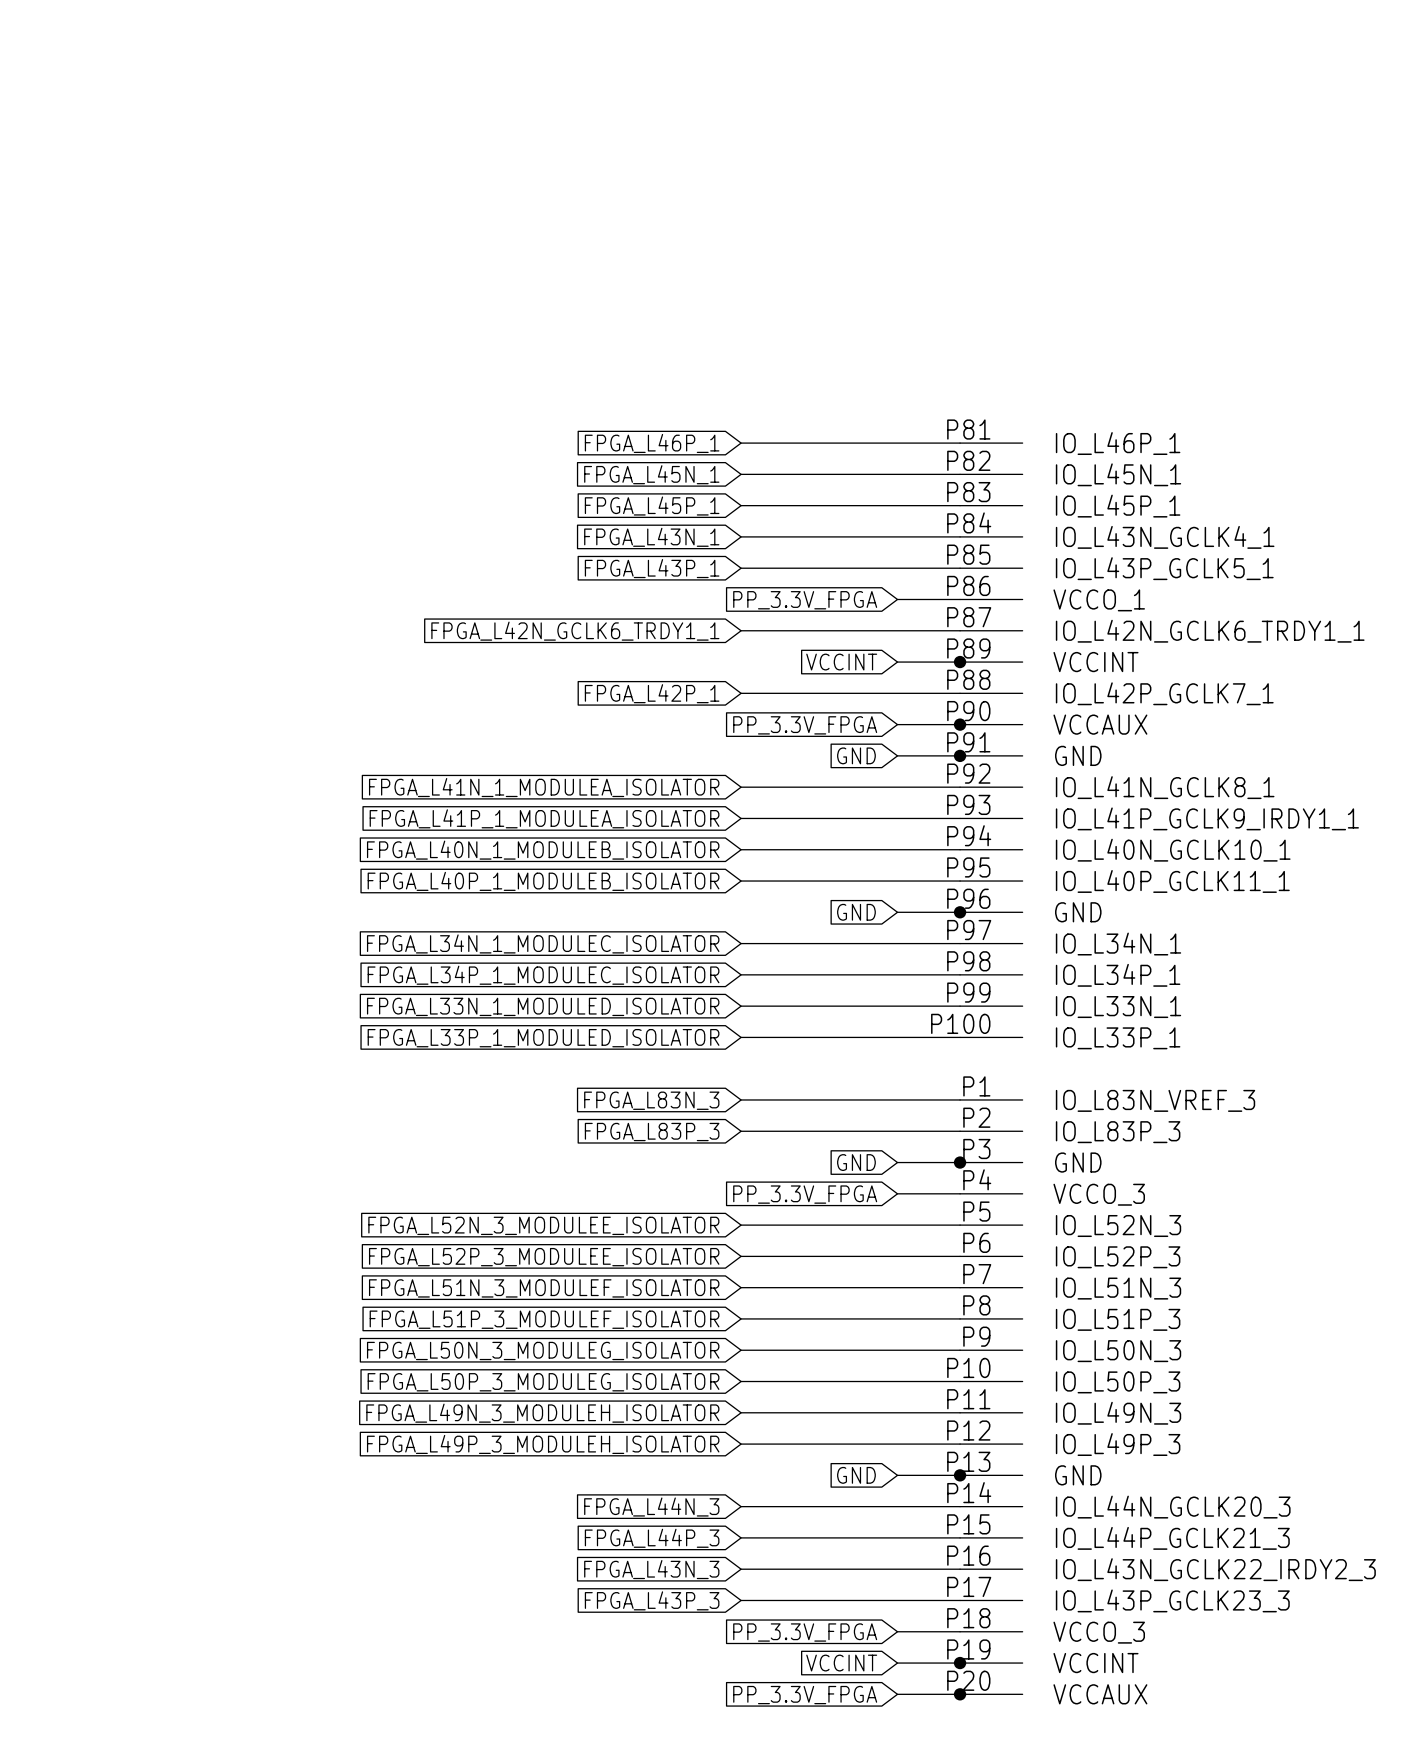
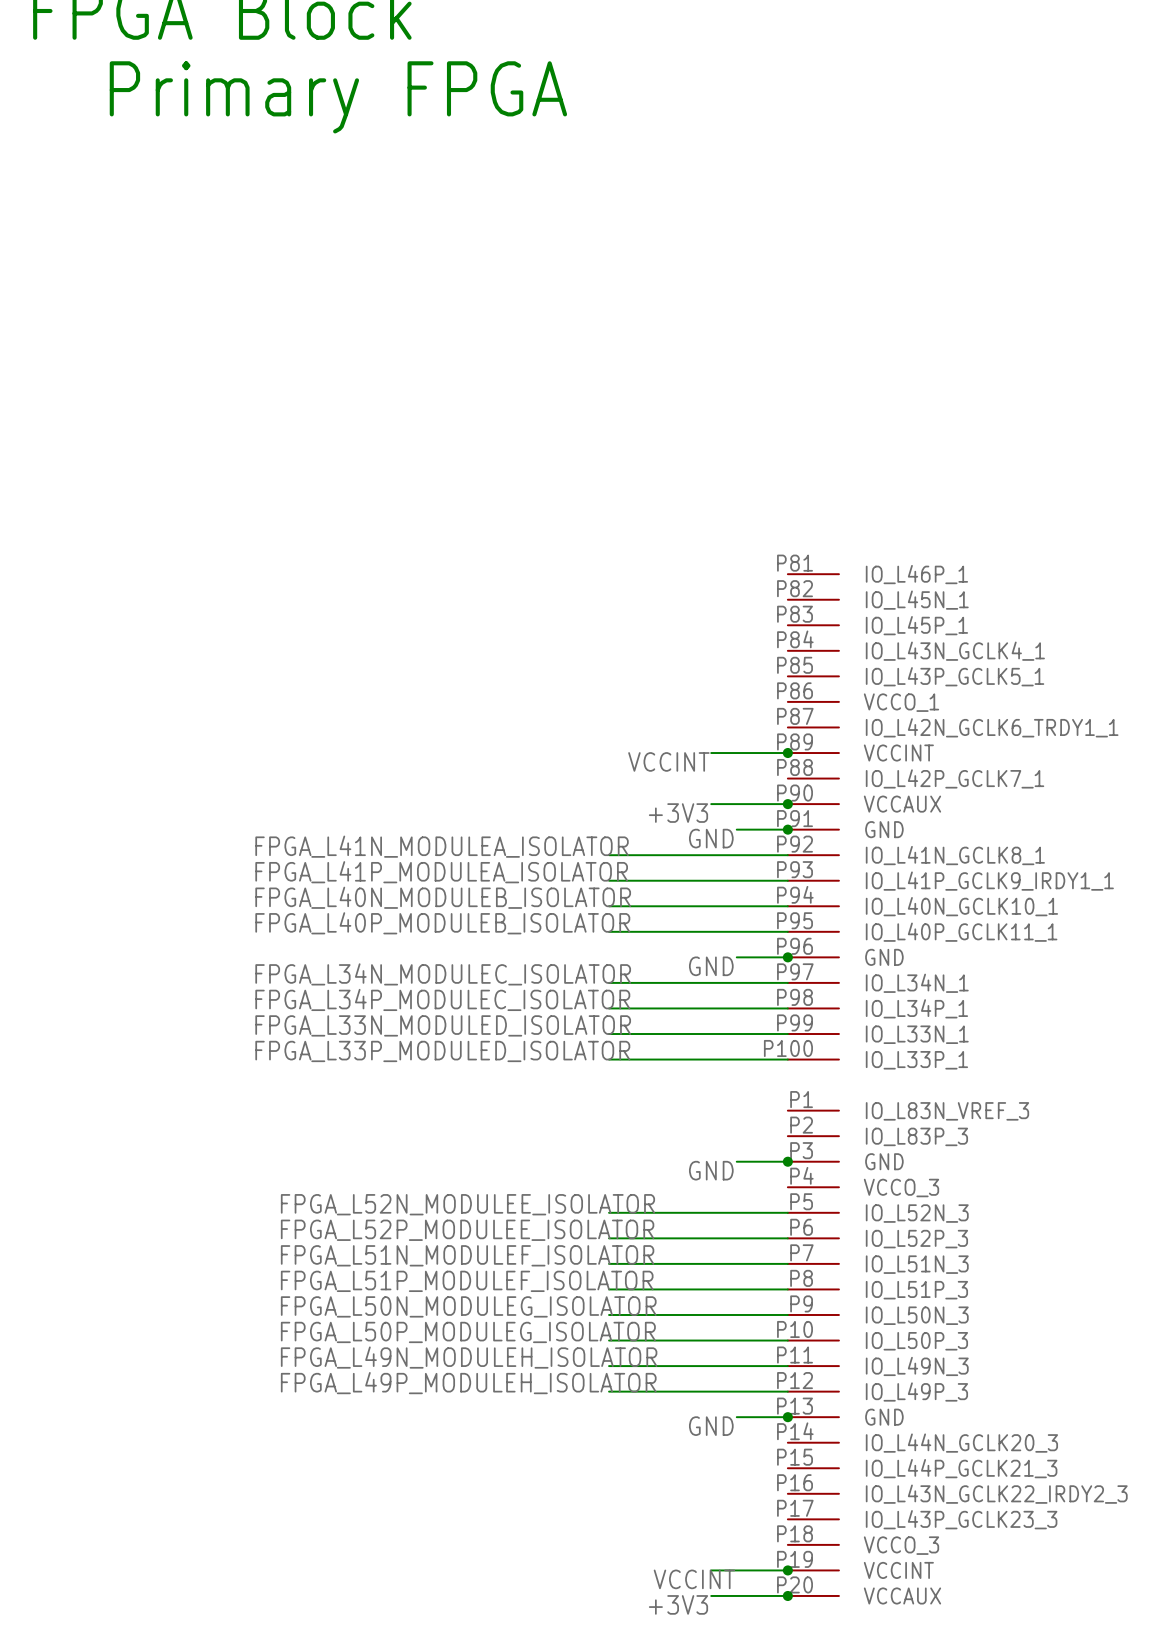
global label: FPGA_L46P_1 (652, 443) -> none
wire: (741, 443) (960, 443) -> none
global label: FPGA_L45N_1 (651, 474) -> none
wire: (741, 474) (960, 474) -> none
wire: (741, 505) (960, 505) -> none
global label: FPGA_L45P_1 (652, 506) -> none
wire: (741, 536) (960, 536) -> none
global label: FPGA_L43N_1 (651, 537) -> none
global label: FPGA_L43P_1 (652, 568) -> none
wire: (741, 568) (960, 568) -> none
wire: (897, 599) (960, 599) -> none
global label: PP_3.3V_FPGA (805, 600) -> none
wire: (741, 630) (960, 630) -> none
global label: FPGA_L42N_GCLK6_TRDY1_1 (575, 631) -> none
global label: VCCINT (841, 662) -> none
wire: none -> (711, 753) (736, 753)
label: none -> VCCINT (668, 761)
global label: FPGA_L42P_1 (652, 693) -> none
wire: (741, 693) (960, 693) -> none
wire: none -> (711, 804) (736, 804)
global label: PP_3.3V_FPGA (805, 725) -> none
label: none -> +3V3 (678, 813)
global label: GND (856, 755) -> none
label: none -> GND (711, 838)
label: none -> FPGA_L41N_MODULEA_ISOLATOR (442, 846)
global label: FPGA_L41N_1_MODULEA_ISOLATOR (544, 787) -> none
label: none -> FPGA_L41P_MODULEA_ISOLATOR (441, 872)
global label: FPGA_L41P_1_MODULEA_ISOLATOR (544, 818) -> none
label: none -> FPGA_L40N_MODULEB_ISOLATOR (443, 897)
global label: FPGA_L40N_1_MODULEB_ISOLATOR (543, 850) -> none
label: none -> FPGA_L40P_MODULEB_ISOLATOR (442, 923)
global label: FPGA_L40P_1_MODULEB_ISOLATOR (543, 881) -> none
global label: GND (856, 912) -> none
label: none -> GND (711, 966)
label: none -> FPGA_L34N_MODULEC_ISOLATOR (443, 974)
global label: FPGA_L34N_1_MODULEC_ISOLATOR (543, 943) -> none
label: none -> FPGA_L34P_MODULEC_ISOLATOR (442, 999)
global label: FPGA_L34P_1_MODULEC_ISOLATOR (543, 975) -> none
label: none -> FPGA_L33N_MODULED_ISOLATOR (443, 1025)
global label: FPGA_L33N_1_MODULED_ISOLATOR (543, 1006) -> none
label: none -> FPGA_L33P_MODULED_ISOLATOR (442, 1051)
global label: FPGA_L33P_1_MODULED_ISOLATOR (543, 1038) -> none
wire: (741, 1099) (960, 1099) -> none
global label: FPGA_L83N_3 (651, 1100) -> none
wire: (741, 1131) (960, 1131) -> none
global label: FPGA_L83P_3 (652, 1132) -> none
global label: GND (856, 1162) -> none
label: none -> GND (711, 1170)
wire: (897, 1193) (960, 1193) -> none
global label: PP_3.3V_FPGA (805, 1194) -> none
label: none -> FPGA_L52N_MODULEE_ISOLATOR (467, 1204)
global label: FPGA_L52N_3_MODULEE_ISOLATOR (543, 1225) -> none
label: none -> FPGA_L52P_MODULEE_ISOLATOR (467, 1230)
global label: FPGA_L52P_3_MODULEE_ISOLATOR (544, 1257) -> none
label: none -> FPGA_L51N_MODULEF_ISOLATOR (467, 1255)
global label: FPGA_L51N_3_MODULEF_ISOLATOR (544, 1288) -> none
label: none -> FPGA_L51P_MODULEF_ISOLATOR (467, 1281)
global label: FPGA_L51P_3_MODULEF_ISOLATOR (544, 1319) -> none
label: none -> FPGA_L50N_MODULEG_ISOLATOR (468, 1306)
global label: FPGA_L50N_3_MODULEG_ISOLATOR (543, 1350) -> none
label: none -> FPGA_L50P_MODULEG_ISOLATOR (468, 1332)
global label: FPGA_L50P_3_MODULEG_ISOLATOR (543, 1382) -> none
label: none -> FPGA_L49N_MODULEH_ISOLATOR (469, 1357)
global label: FPGA_L49N_3_MODULEH_ISOLATOR (542, 1413) -> none
label: none -> FPGA_L49P_MODULEH_ISOLATOR (468, 1383)
global label: FPGA_L49P_3_MODULEH_ISOLATOR (543, 1444) -> none
global label: GND (856, 1475) -> none
label: none -> GND (711, 1426)
wire: (741, 1506) (960, 1506) -> none
global label: FPGA_L44N_3 (651, 1507) -> none
wire: (741, 1537) (960, 1537) -> none
global label: FPGA_L44P_3 (652, 1538) -> none
global label: FPGA_L43N_3 (651, 1569) -> none
wire: (741, 1569) (960, 1569) -> none
global label: FPGA_L43P_3 (652, 1600) -> none
wire: (741, 1600) (960, 1600) -> none
wire: (897, 1631) (960, 1631) -> none
global label: PP_3.3V_FPGA (805, 1632) -> none
global label: VCCINT (841, 1663) -> none
wire: none -> (711, 1570) (736, 1570)
label: none -> VCCINT (694, 1579)
wire: none -> (711, 1595) (736, 1595)
global label: PP_3.3V_FPGA (805, 1695) -> none
label: none -> +3V3 (678, 1604)

